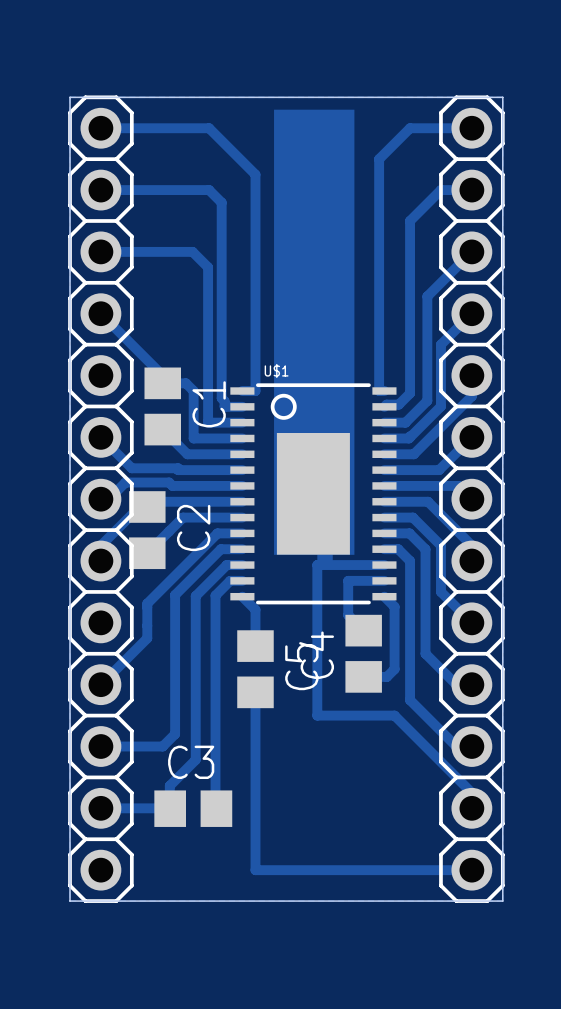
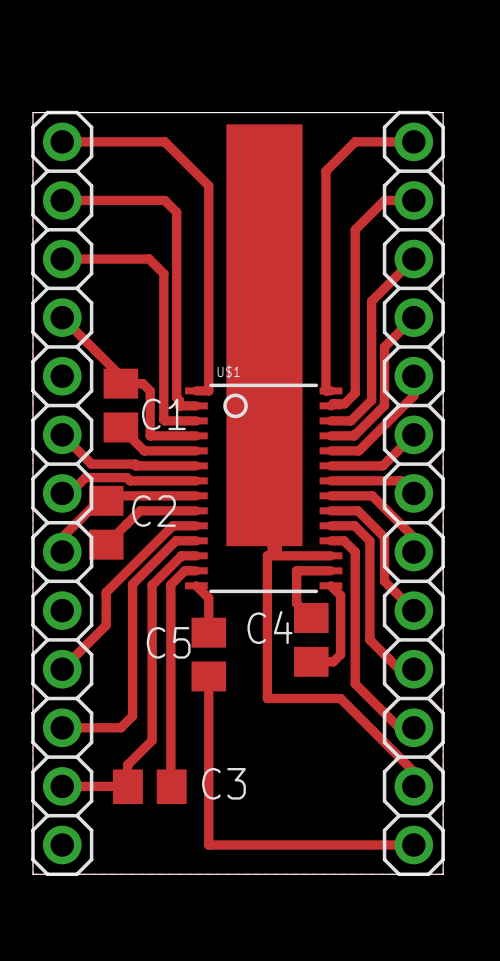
C1 name rotation: 0° (209, 404) -> 90° clockwise (163, 414)
C2 name rotation: 0° (193, 527) -> 90° clockwise (154, 511)
C4 name rotation: 0° (316, 655) -> 90° clockwise (270, 627)
C5 name rotation: 0° (301, 667) -> 90° clockwise (168, 642)
C5 name position: C5 (301, 667) -> C5 (168, 642)
C3 name position: C3 (191, 762) -> C3 (223, 783)

